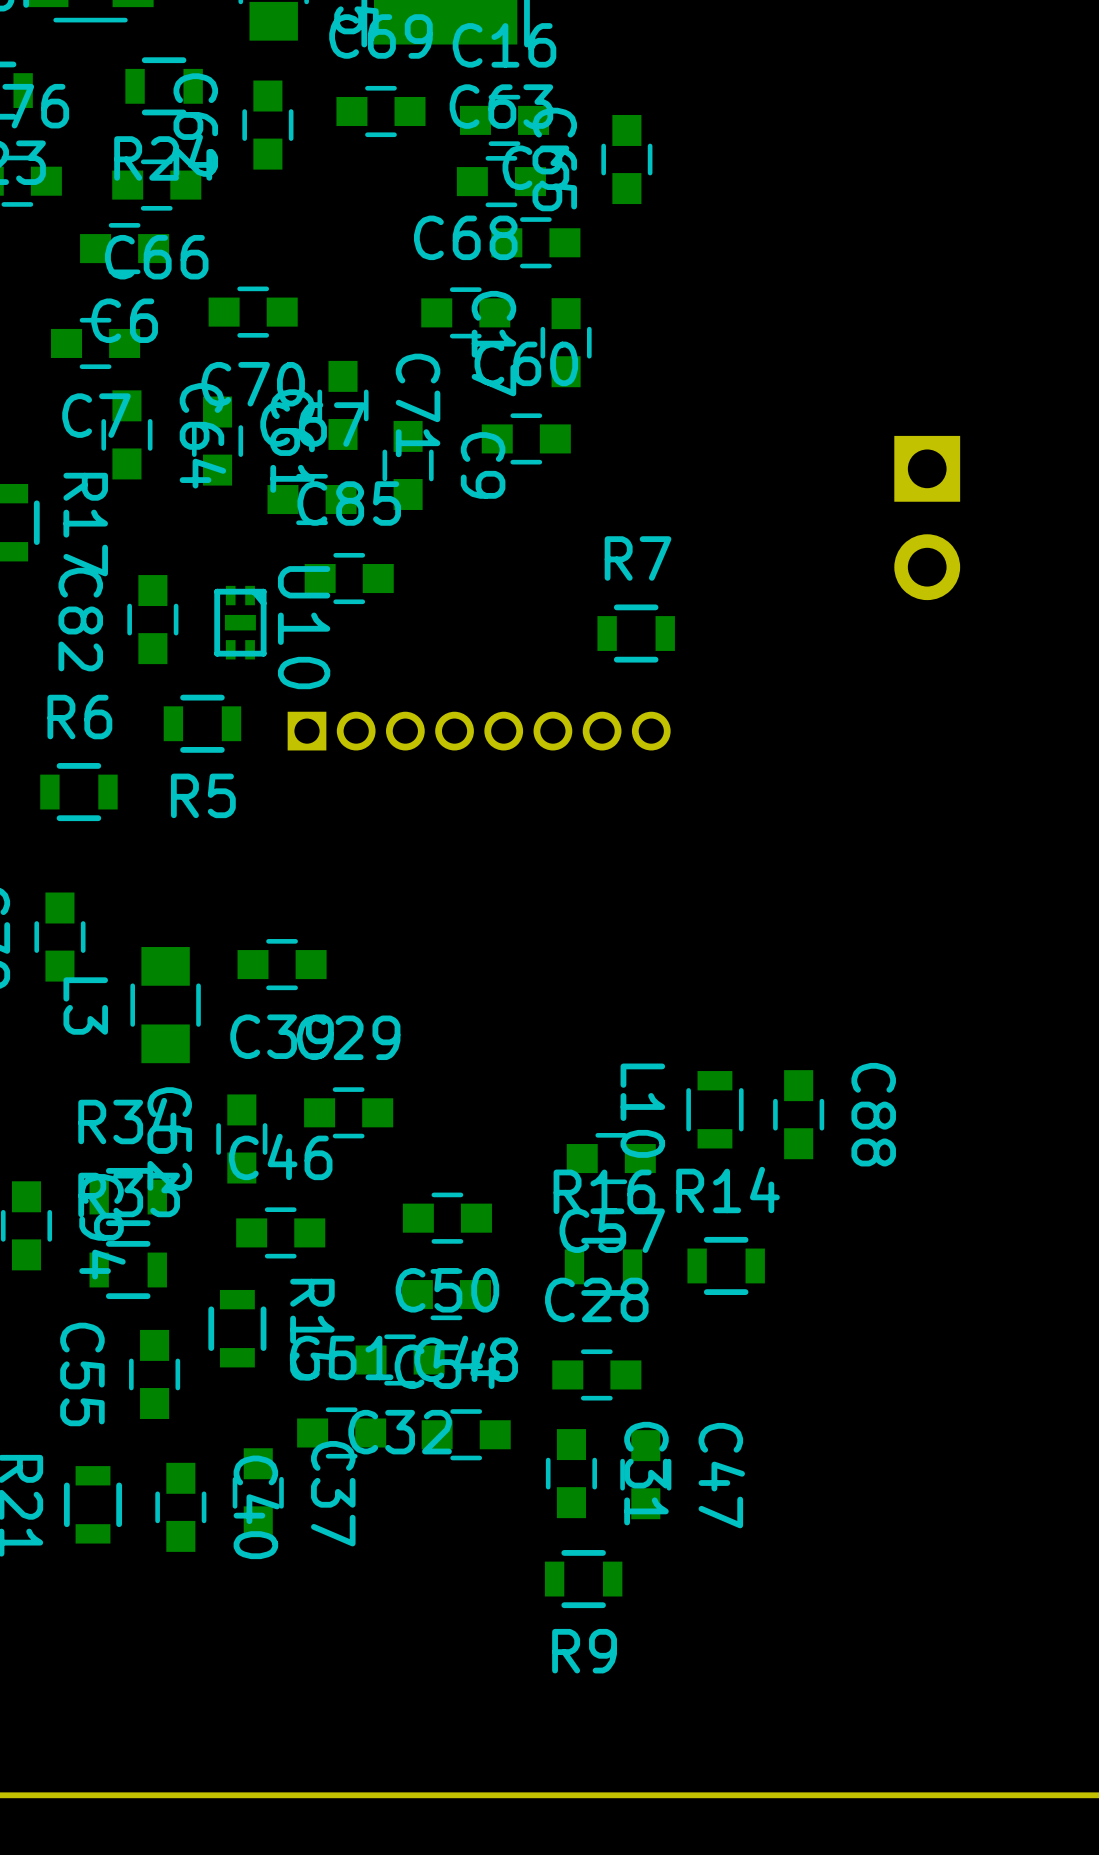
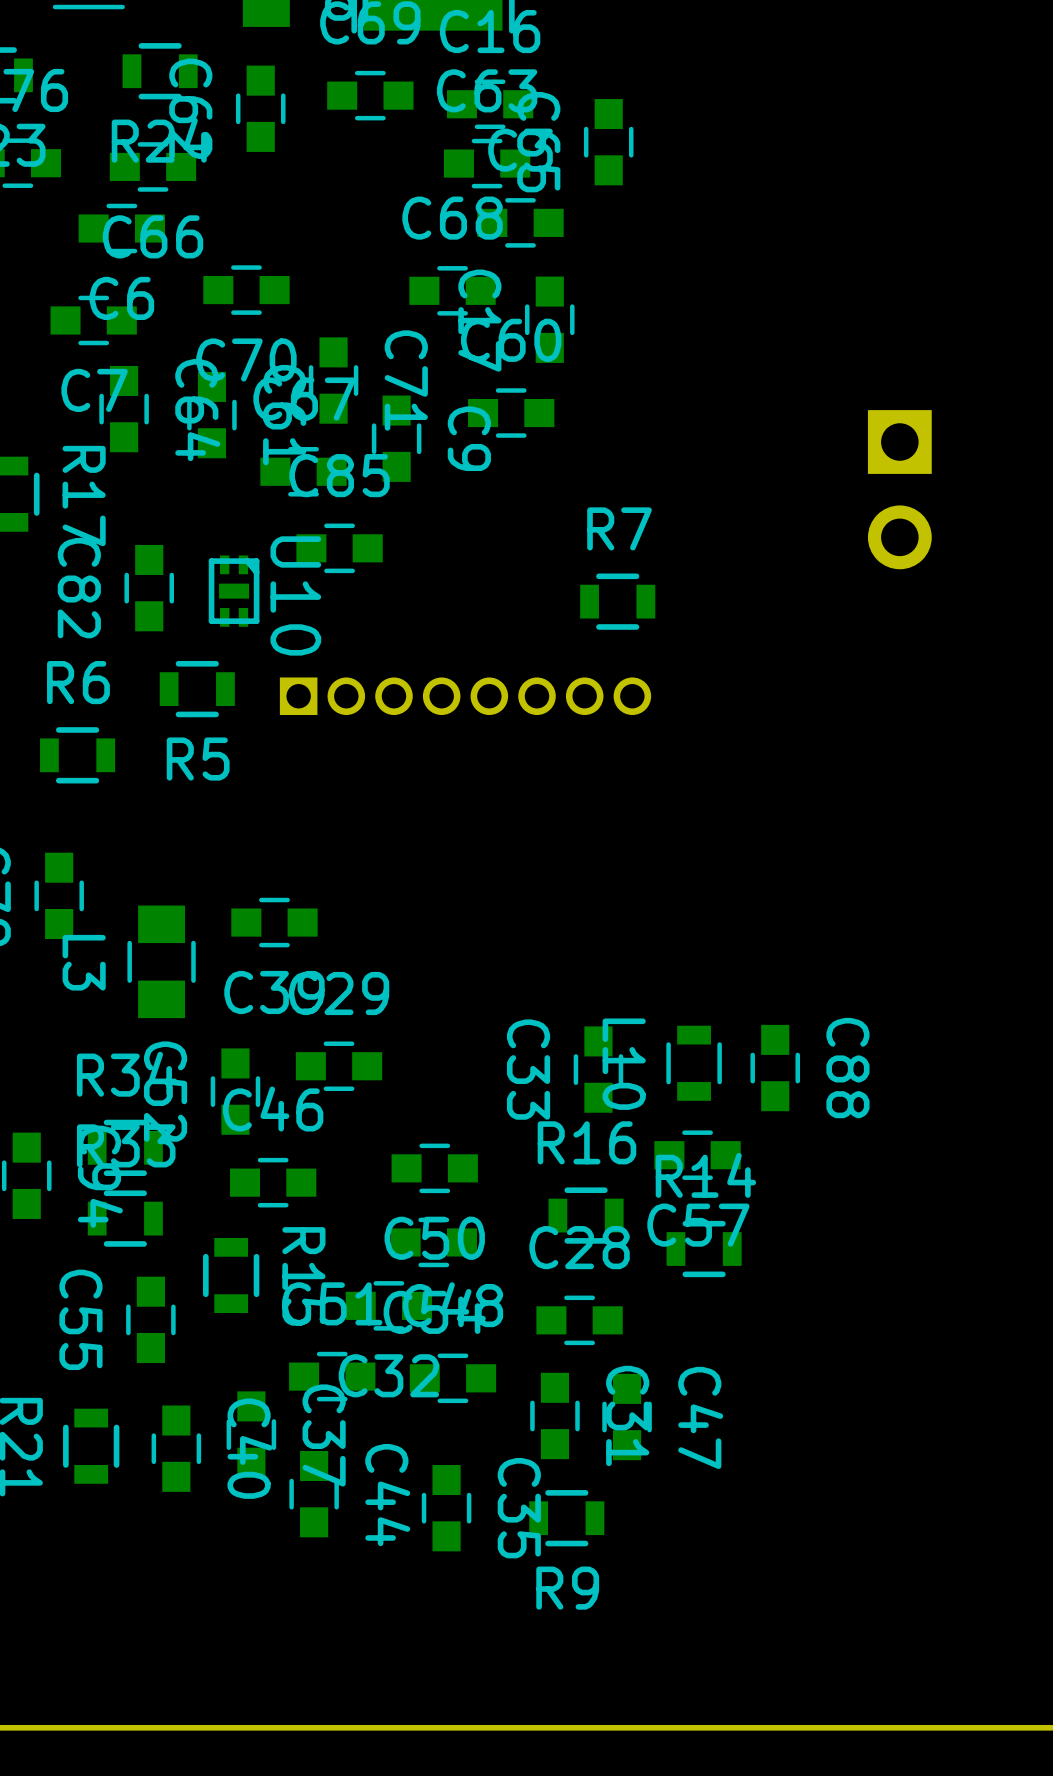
C33: none -> (598, 1069)
C57 position: (611, 1158) -> (697, 1155)
R14 position: (726, 1265) -> (704, 1249)
C44: none -> (314, 1494)
C35: none -> (446, 1508)

